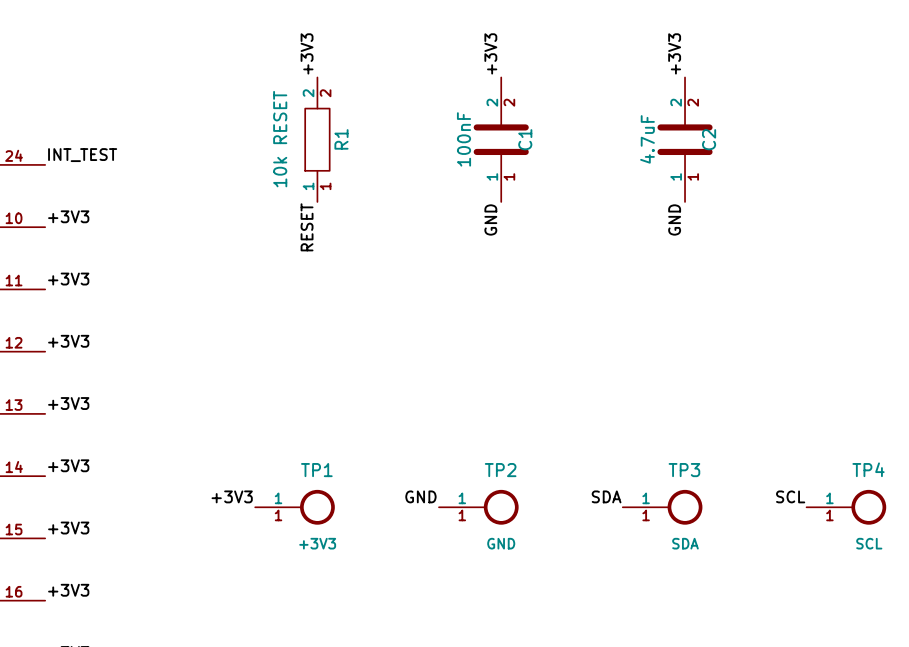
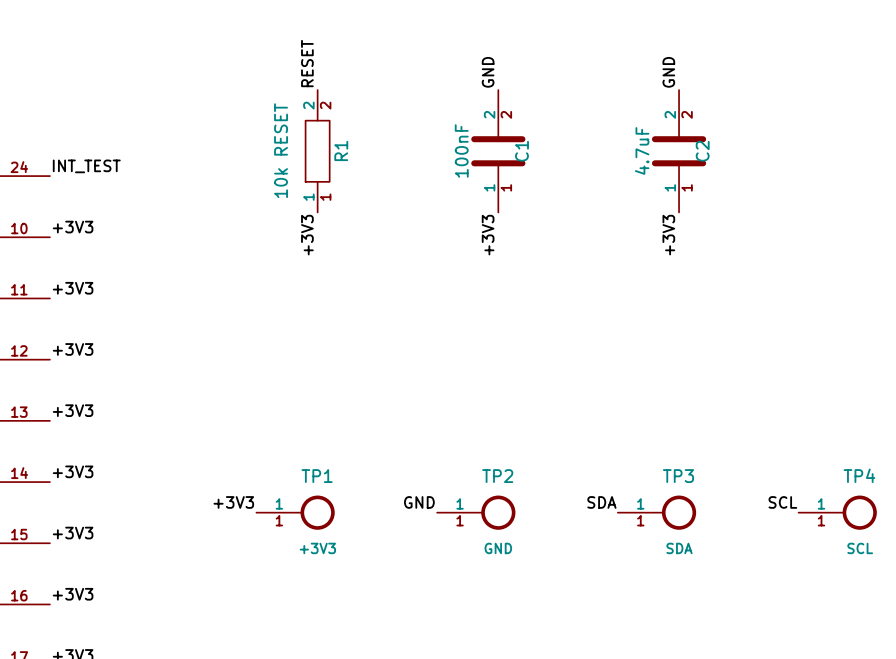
label: +3V3 (307, 53) -> RESET (307, 63)
label: +3V3 (490, 53) -> GND (488, 72)
label: +3V3 (674, 53) -> GND (668, 72)
label: GND (490, 219) -> +3V3 (488, 235)
label: GND (674, 219) -> +3V3 (668, 235)
label: RESET (307, 227) -> +3V3 (307, 235)

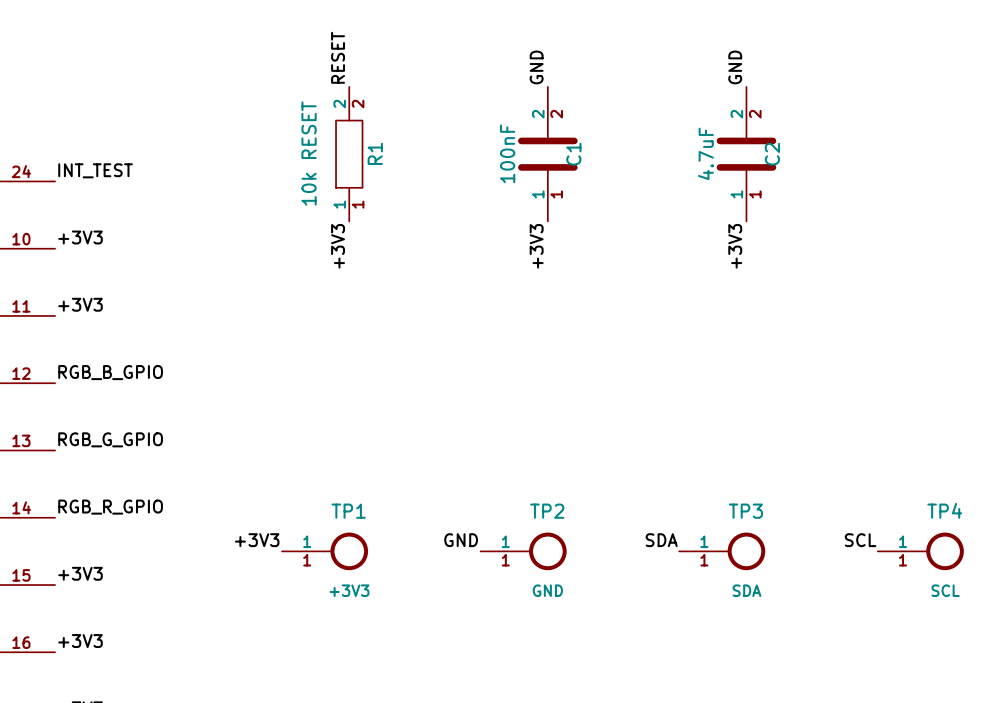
label: +3V3 (73, 349) -> RGB_B_GPIO (110, 372)
label: +3V3 (73, 410) -> RGB_G_GPIO (110, 439)
label: +3V3 (73, 471) -> RGB_R_GPIO (110, 507)

